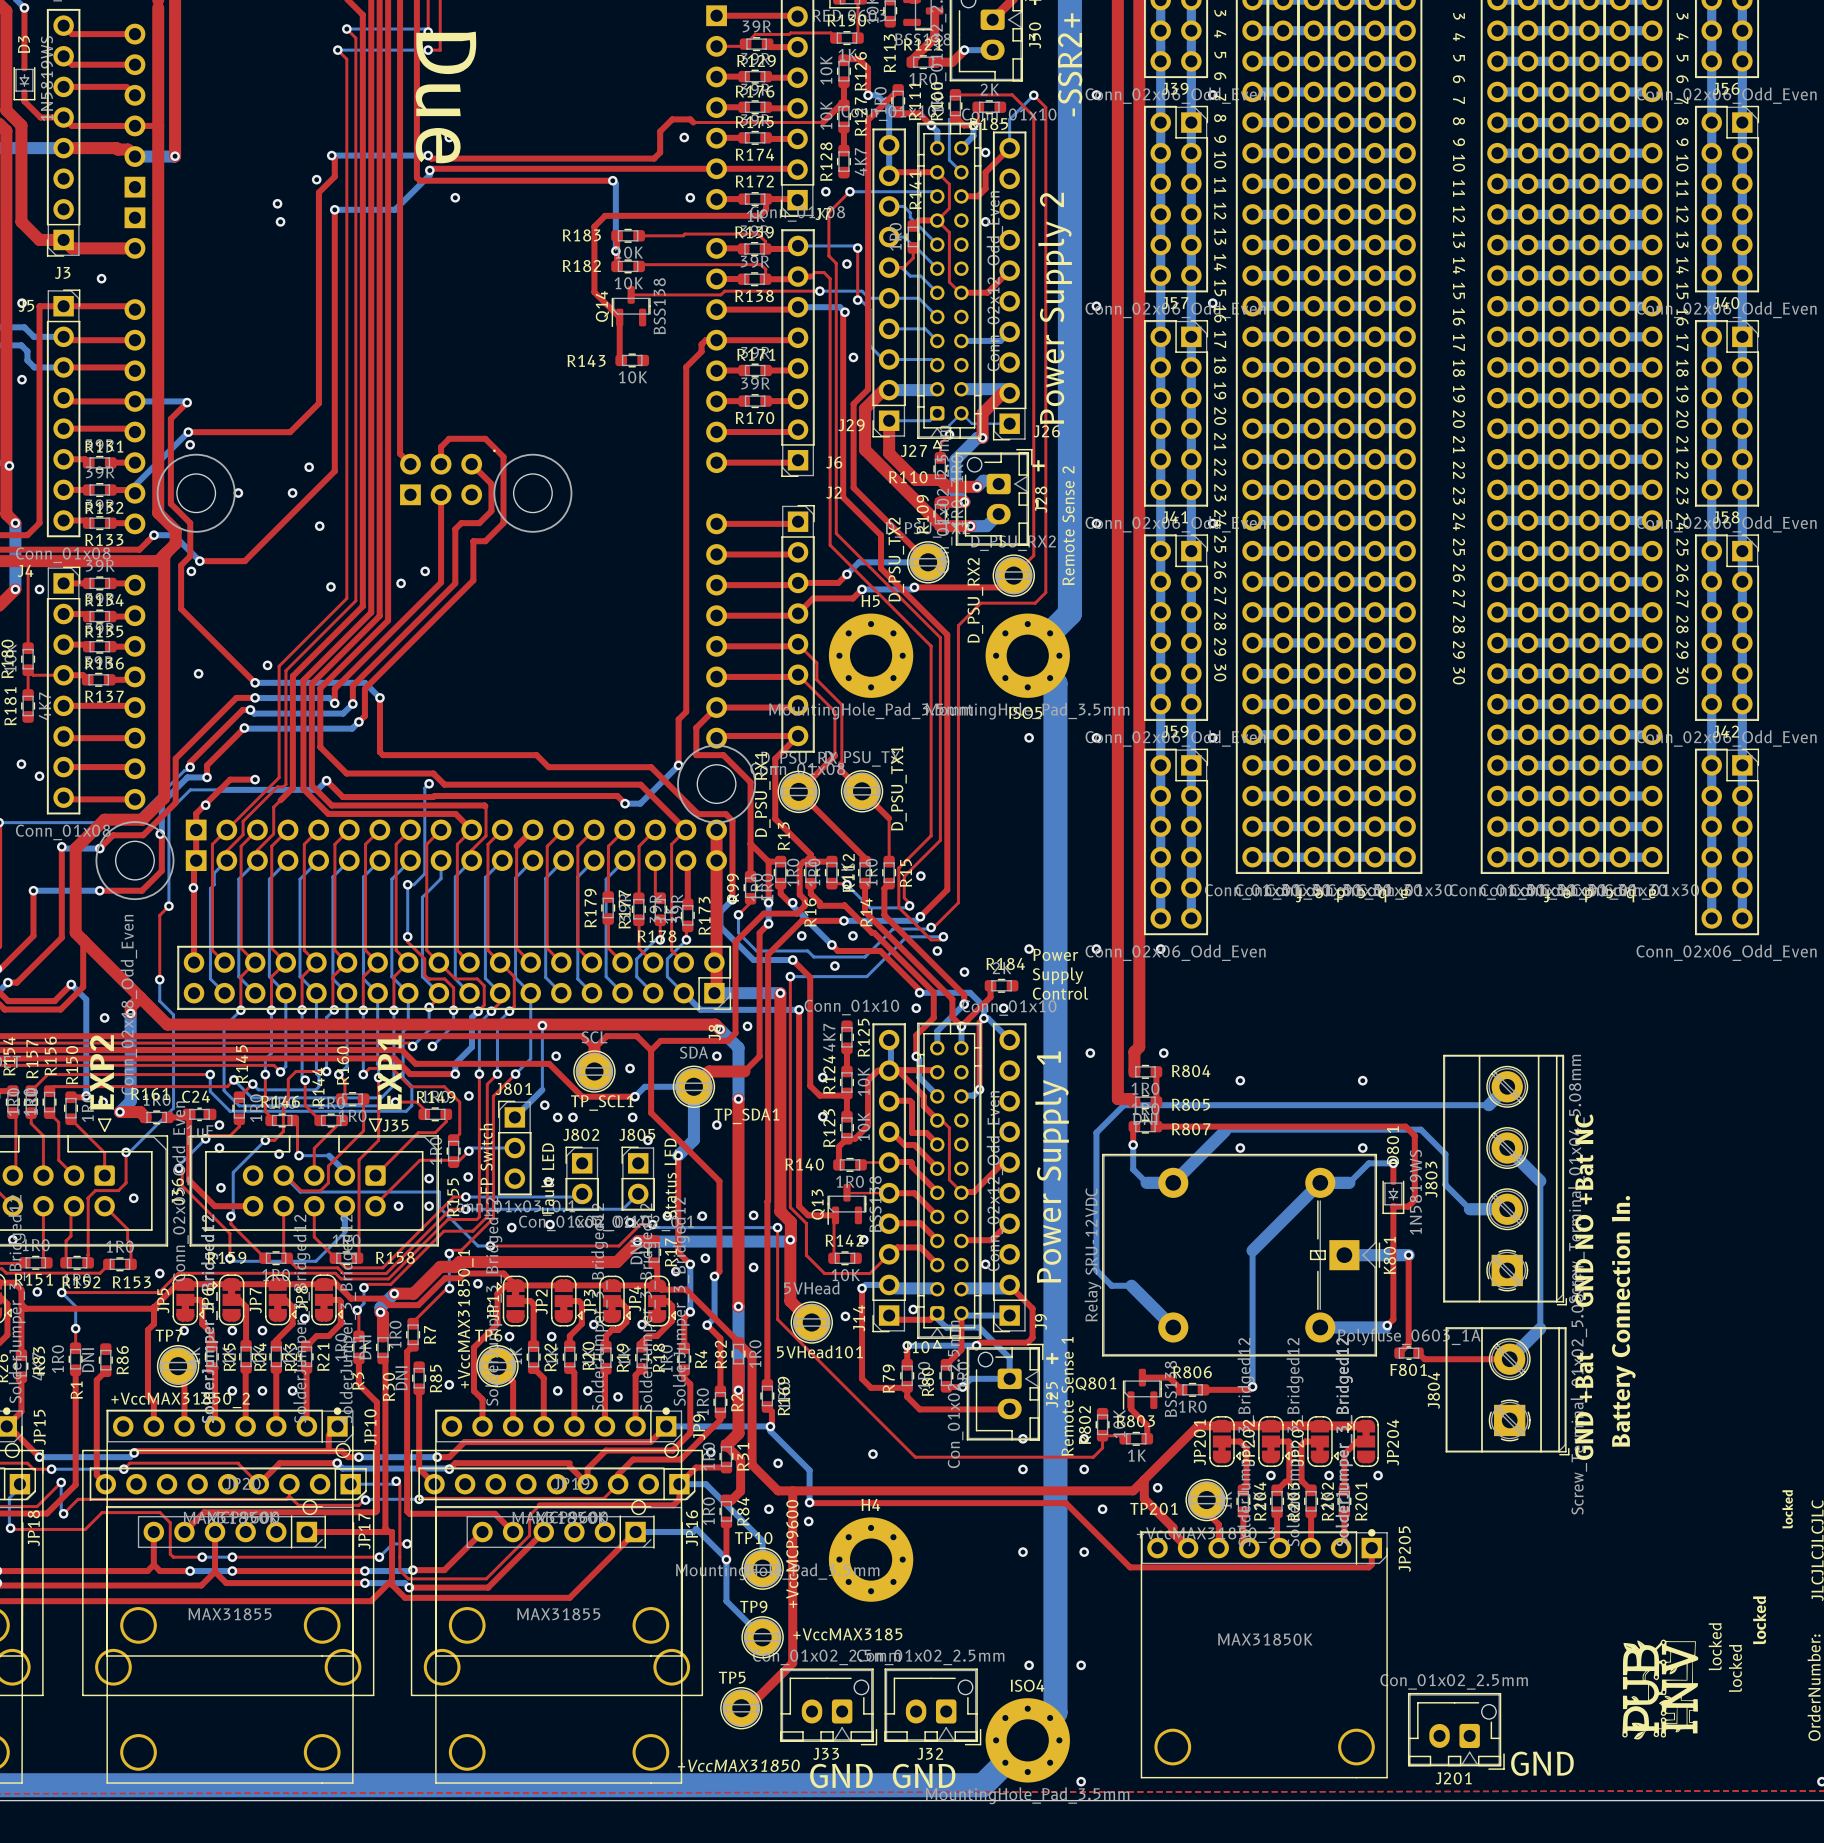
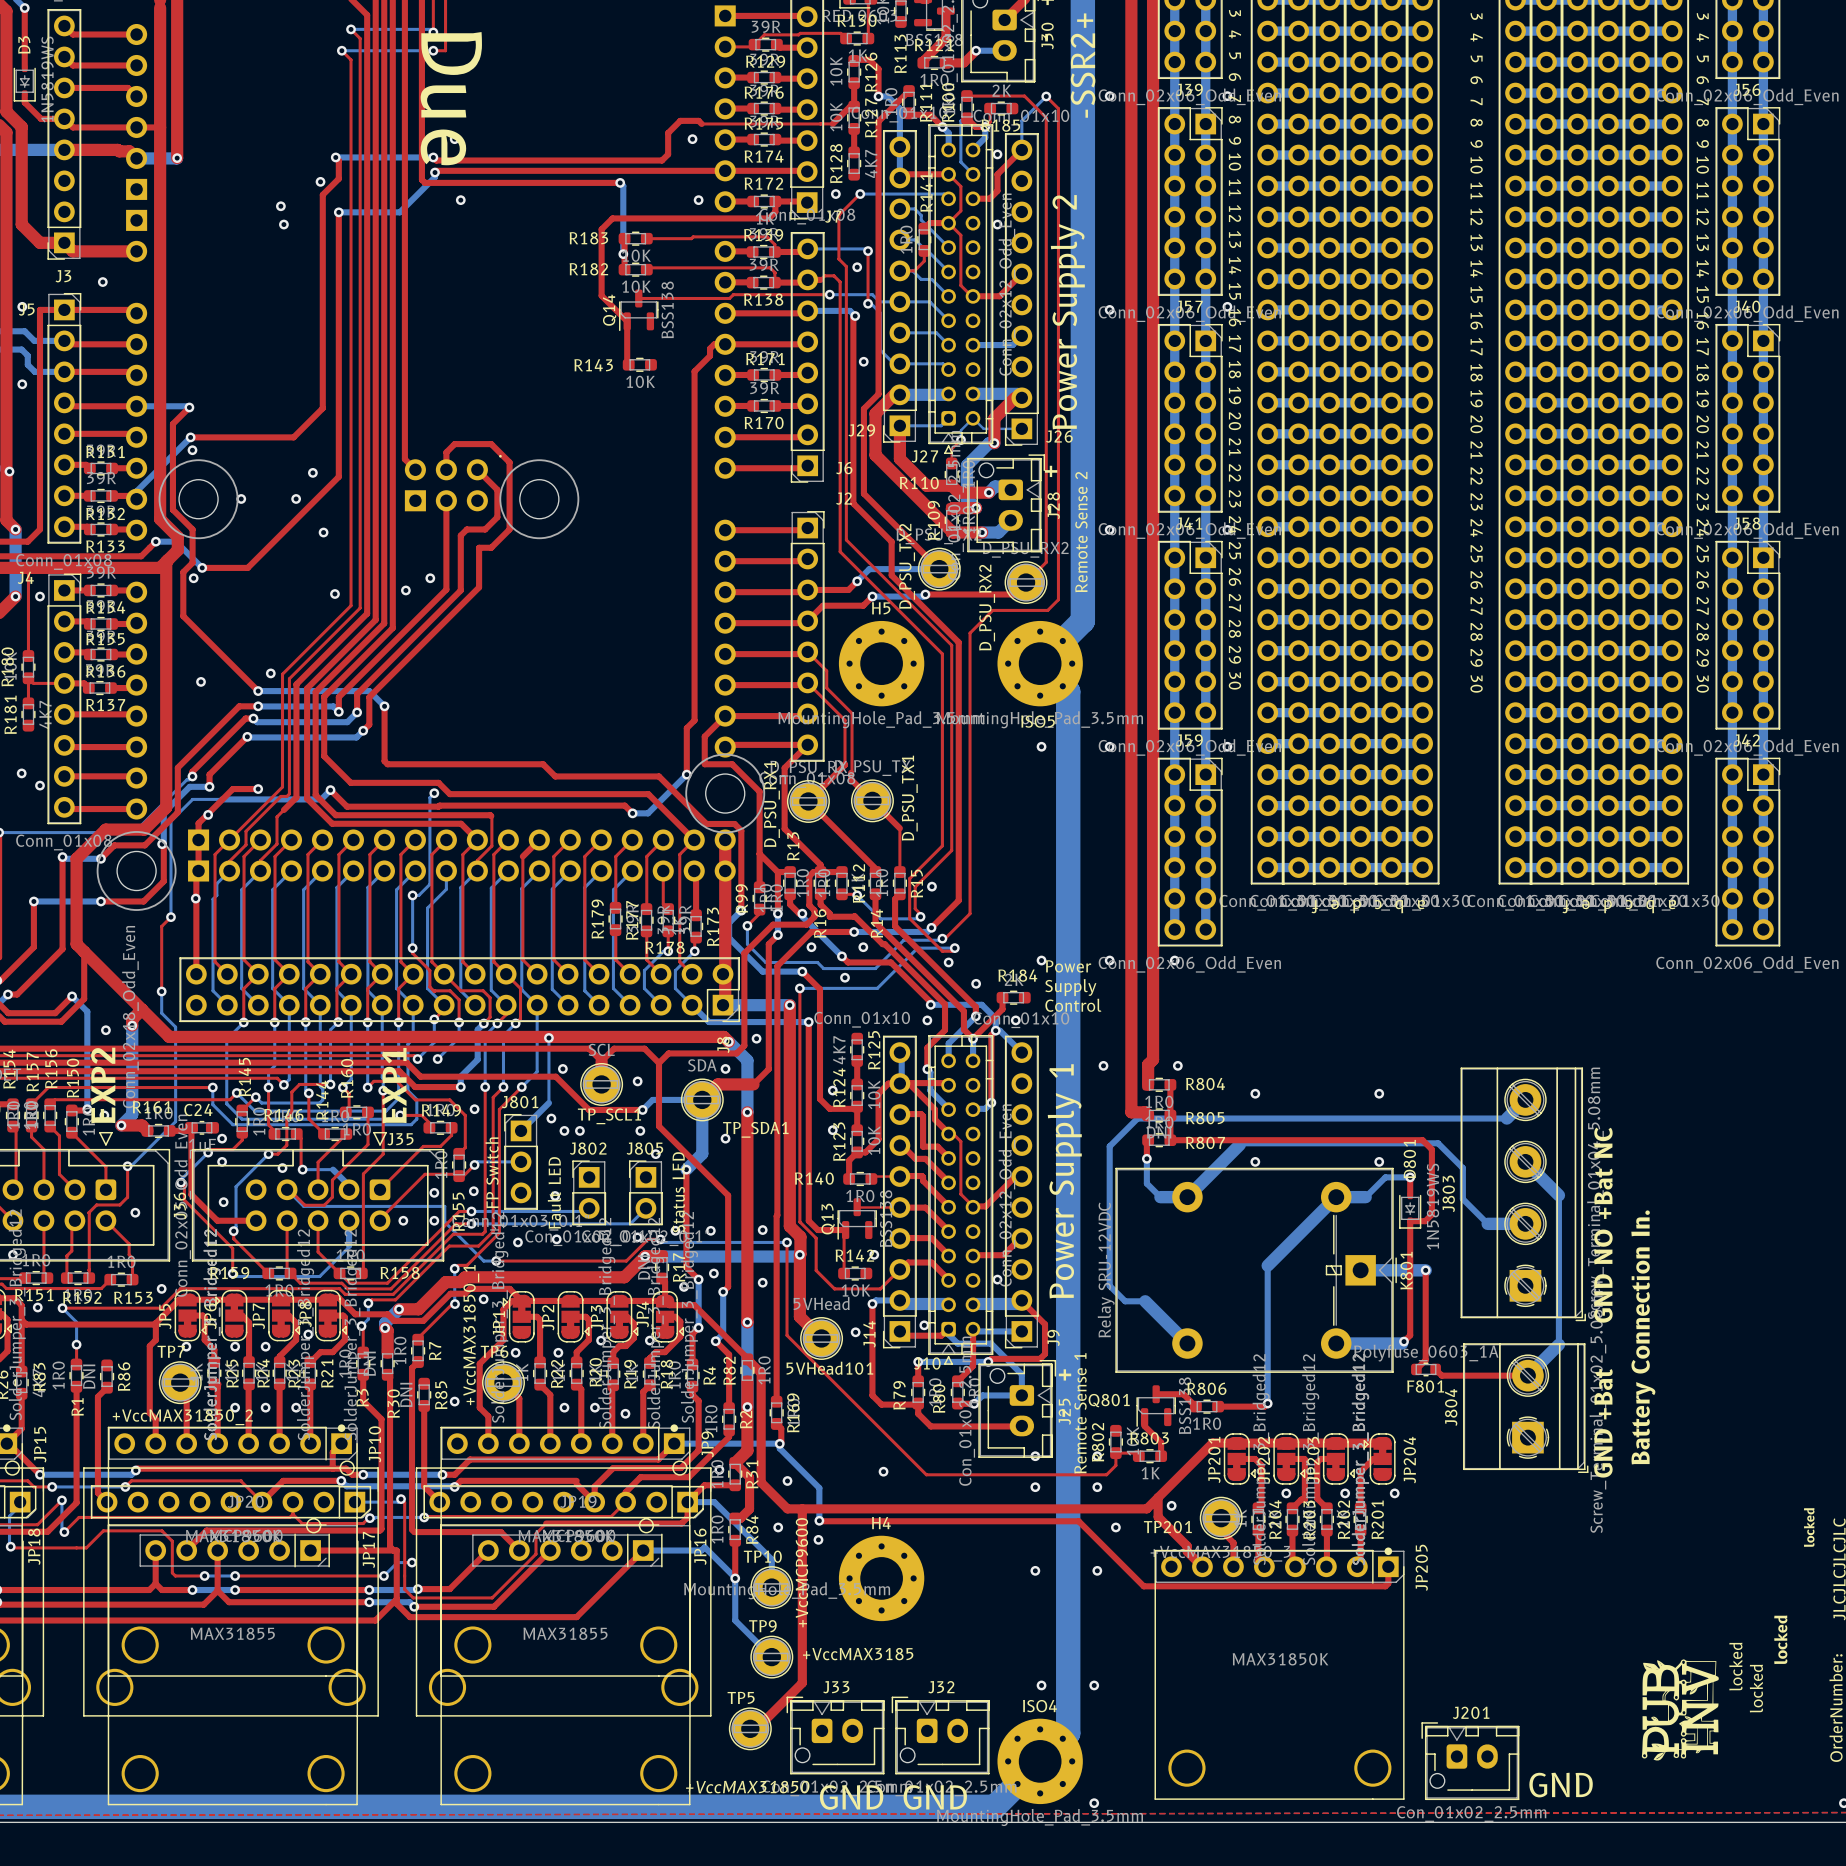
J33 rotation: 0° (828, 1706) -> 180° (835, 1735)
J32 rotation: 0° (932, 1706) -> 180° (940, 1735)
J201 rotation: 0° (1456, 1731) -> 180° (1470, 1761)

